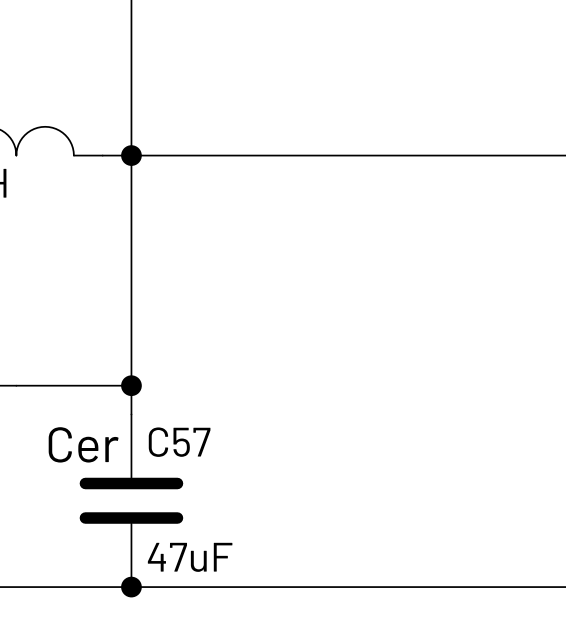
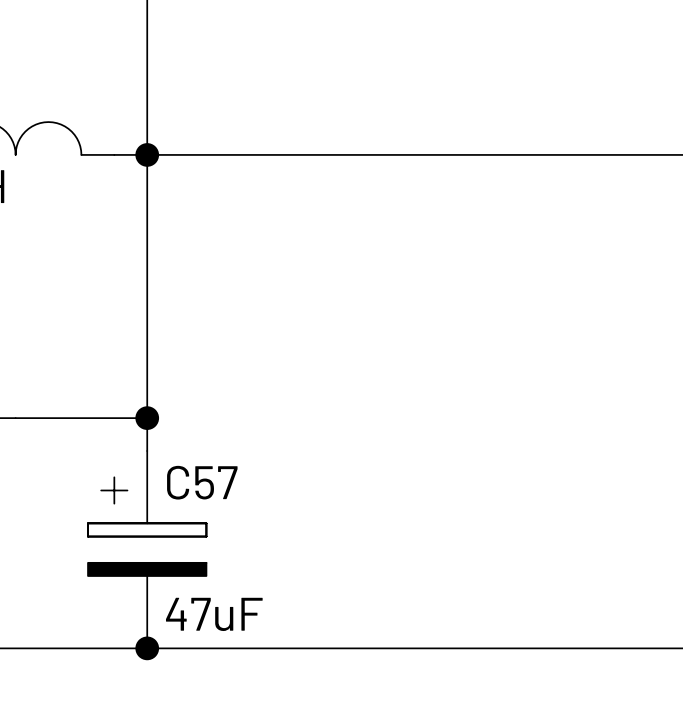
C57 symbol: [79, 414, 184, 588] -> [88, 451, 207, 649]
text: Cer (83, 444) -> none

